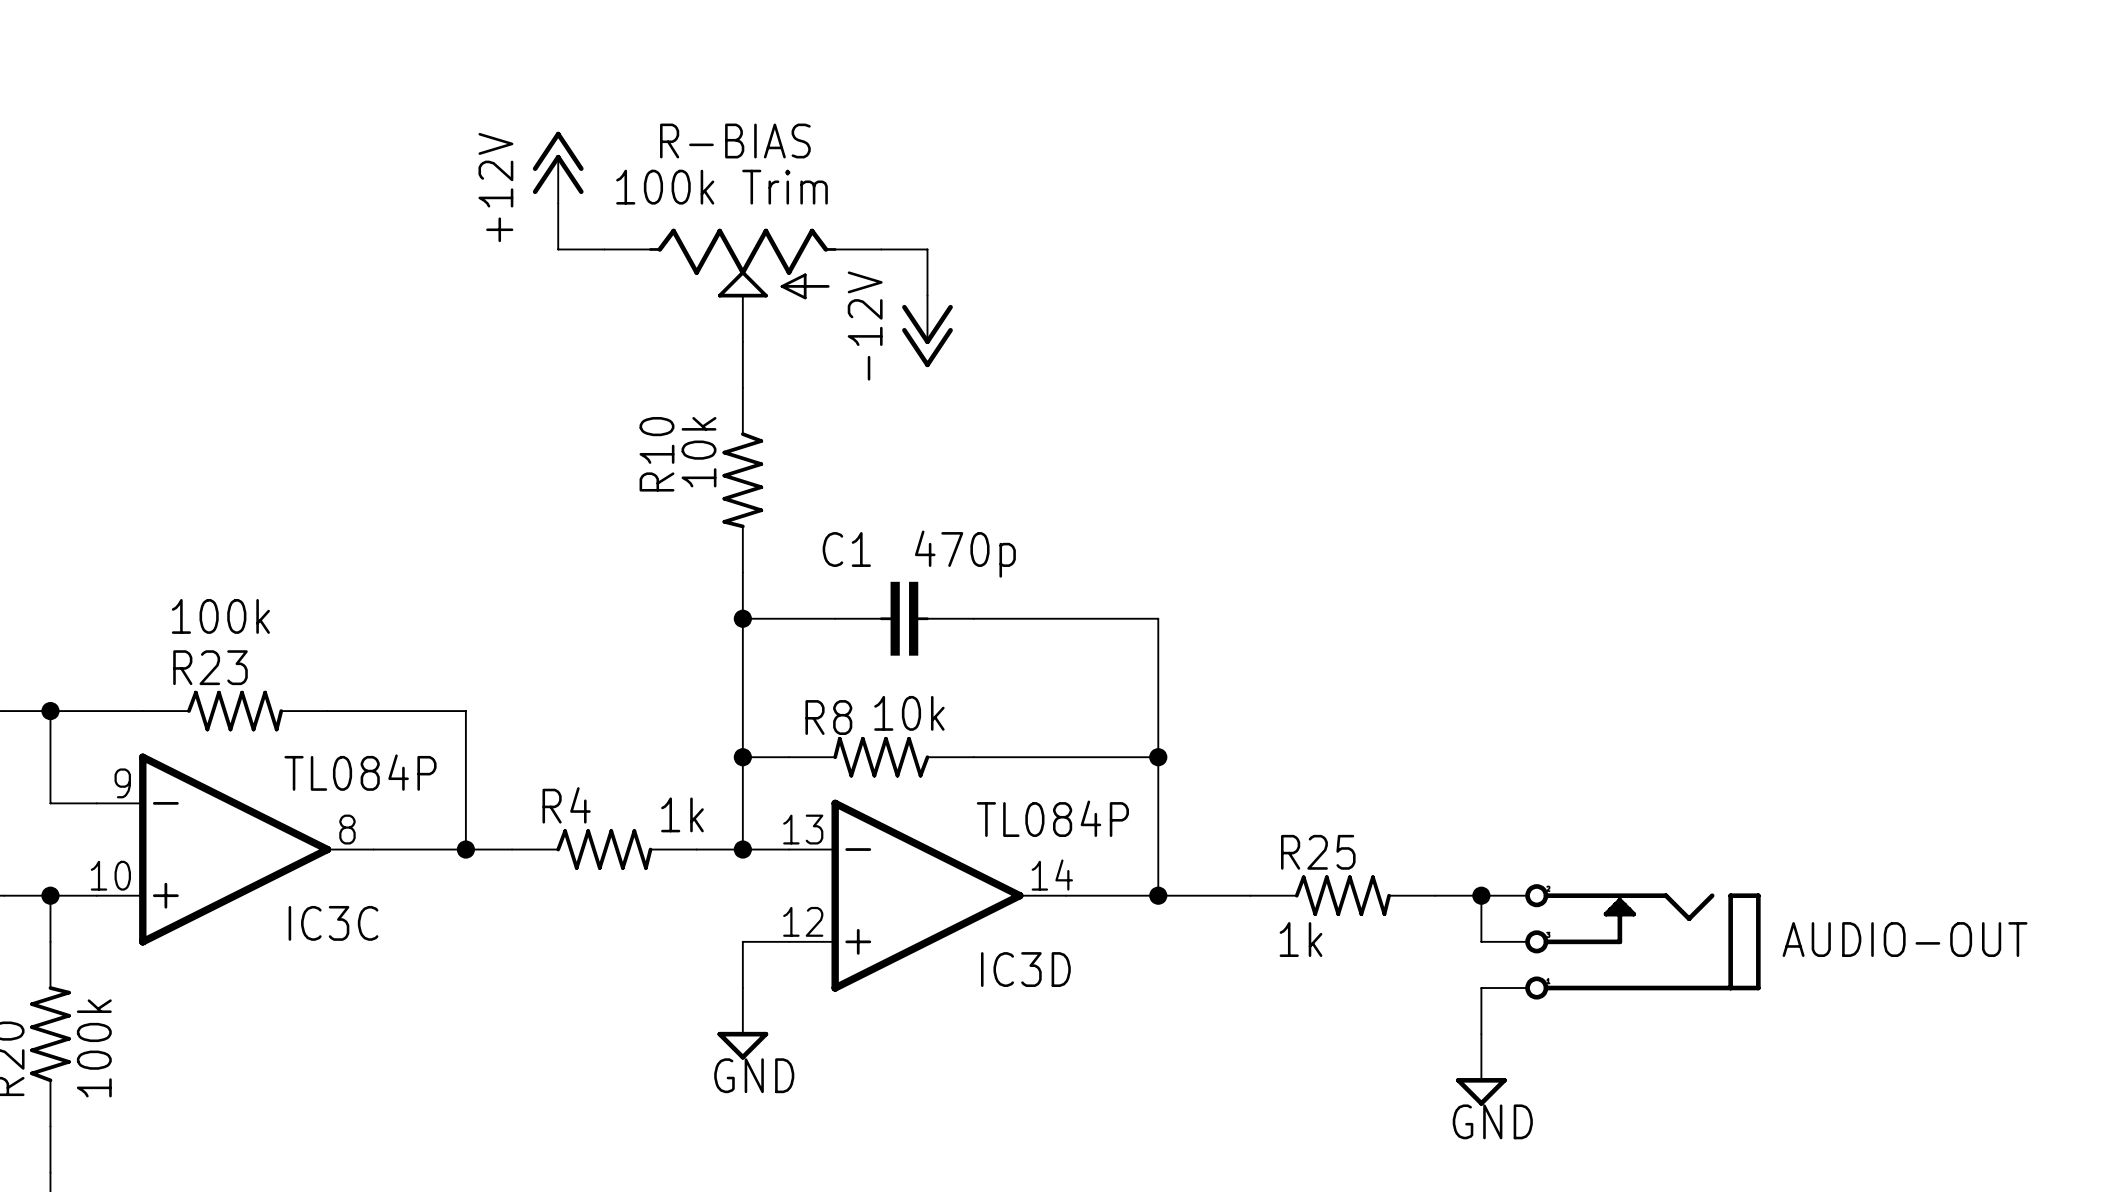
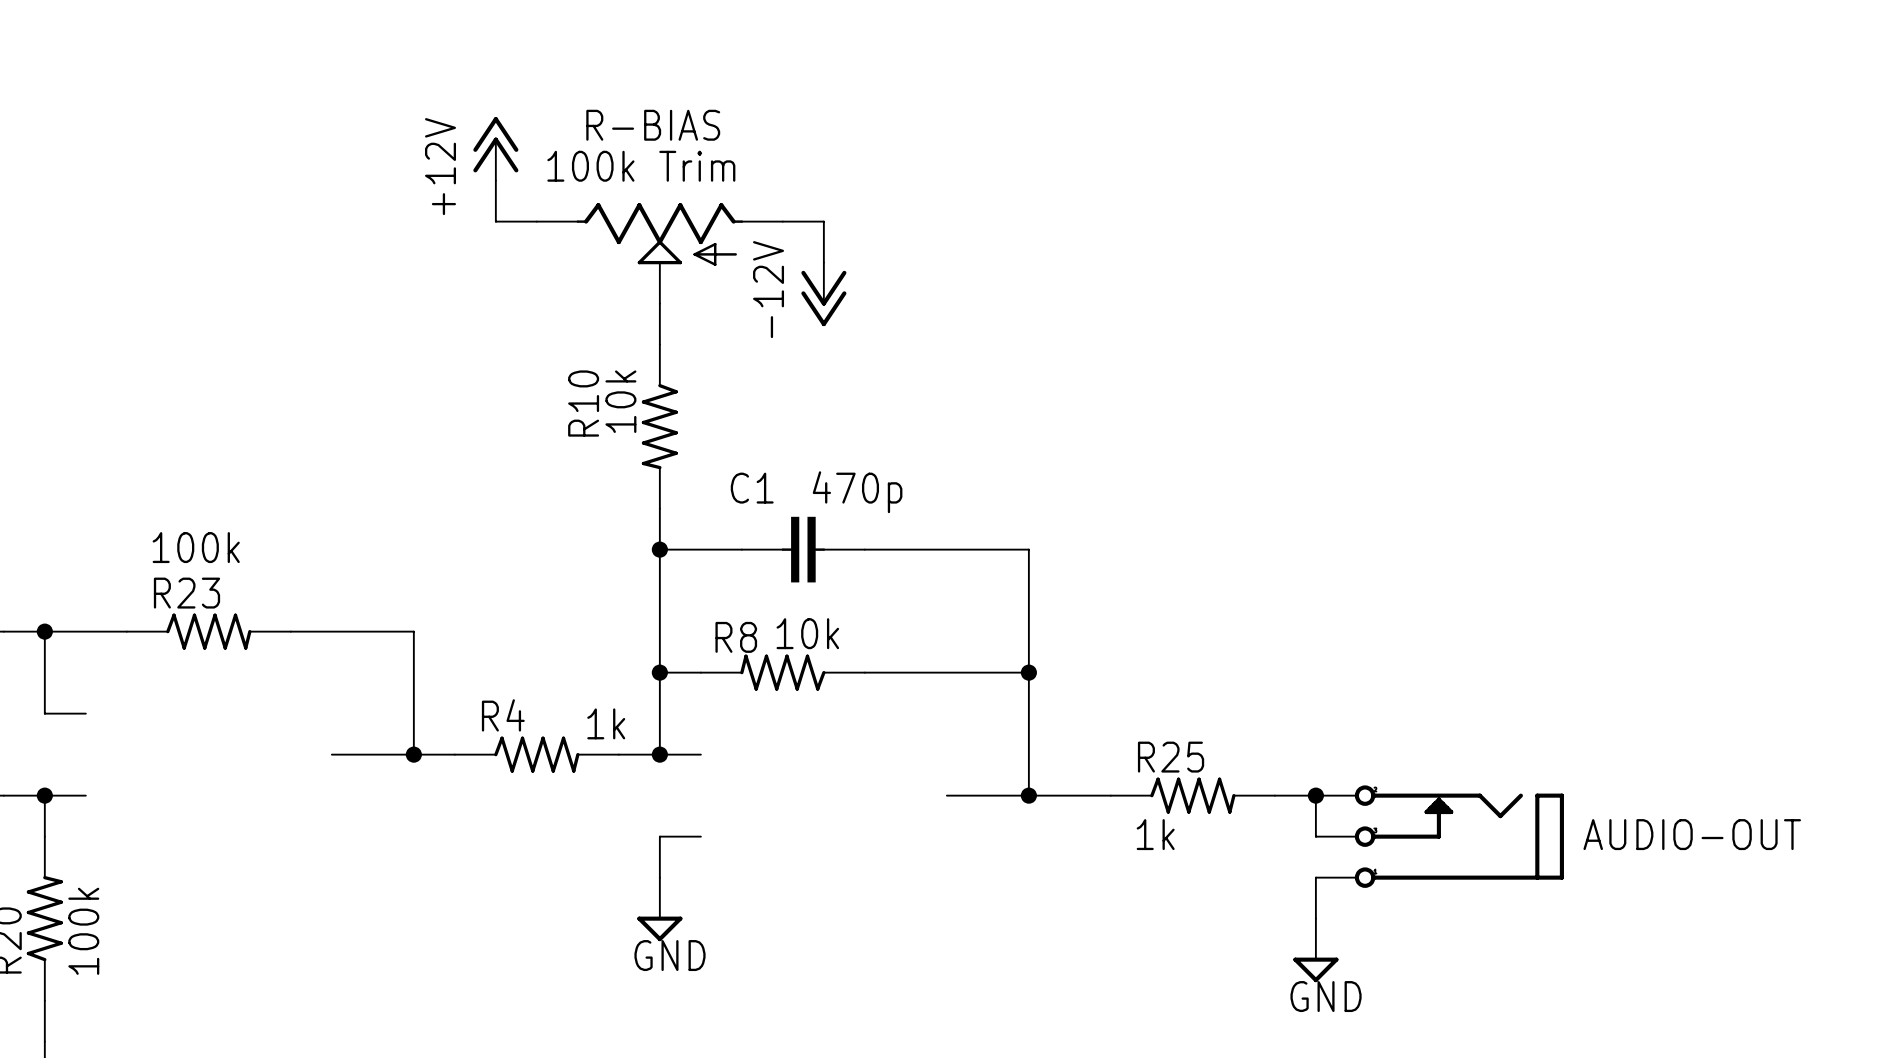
IC3C: TL084P (235, 849) -> none
IC3D: TL084P (927, 895) -> none

